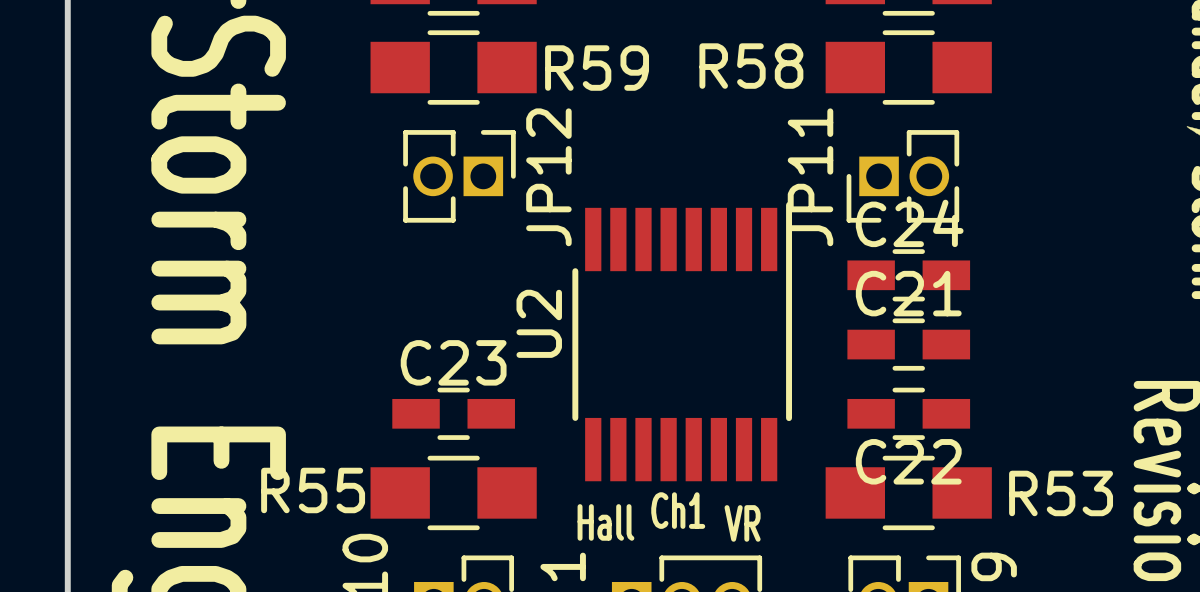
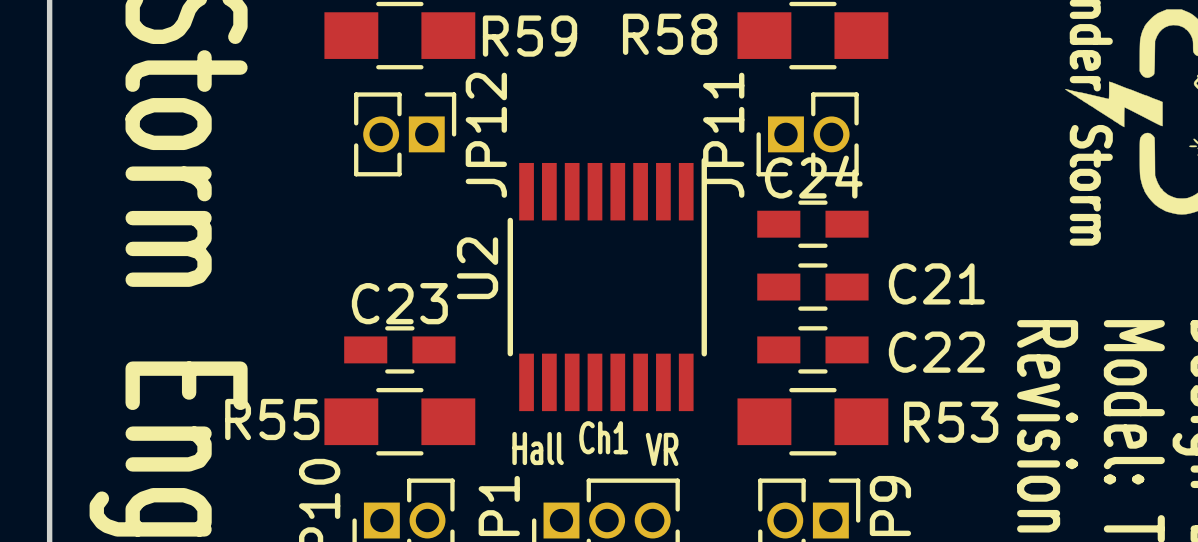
C21 name position: C21 (908, 293) -> C21 (936, 283)
C22 name position: C22 (908, 461) -> C22 (936, 352)

